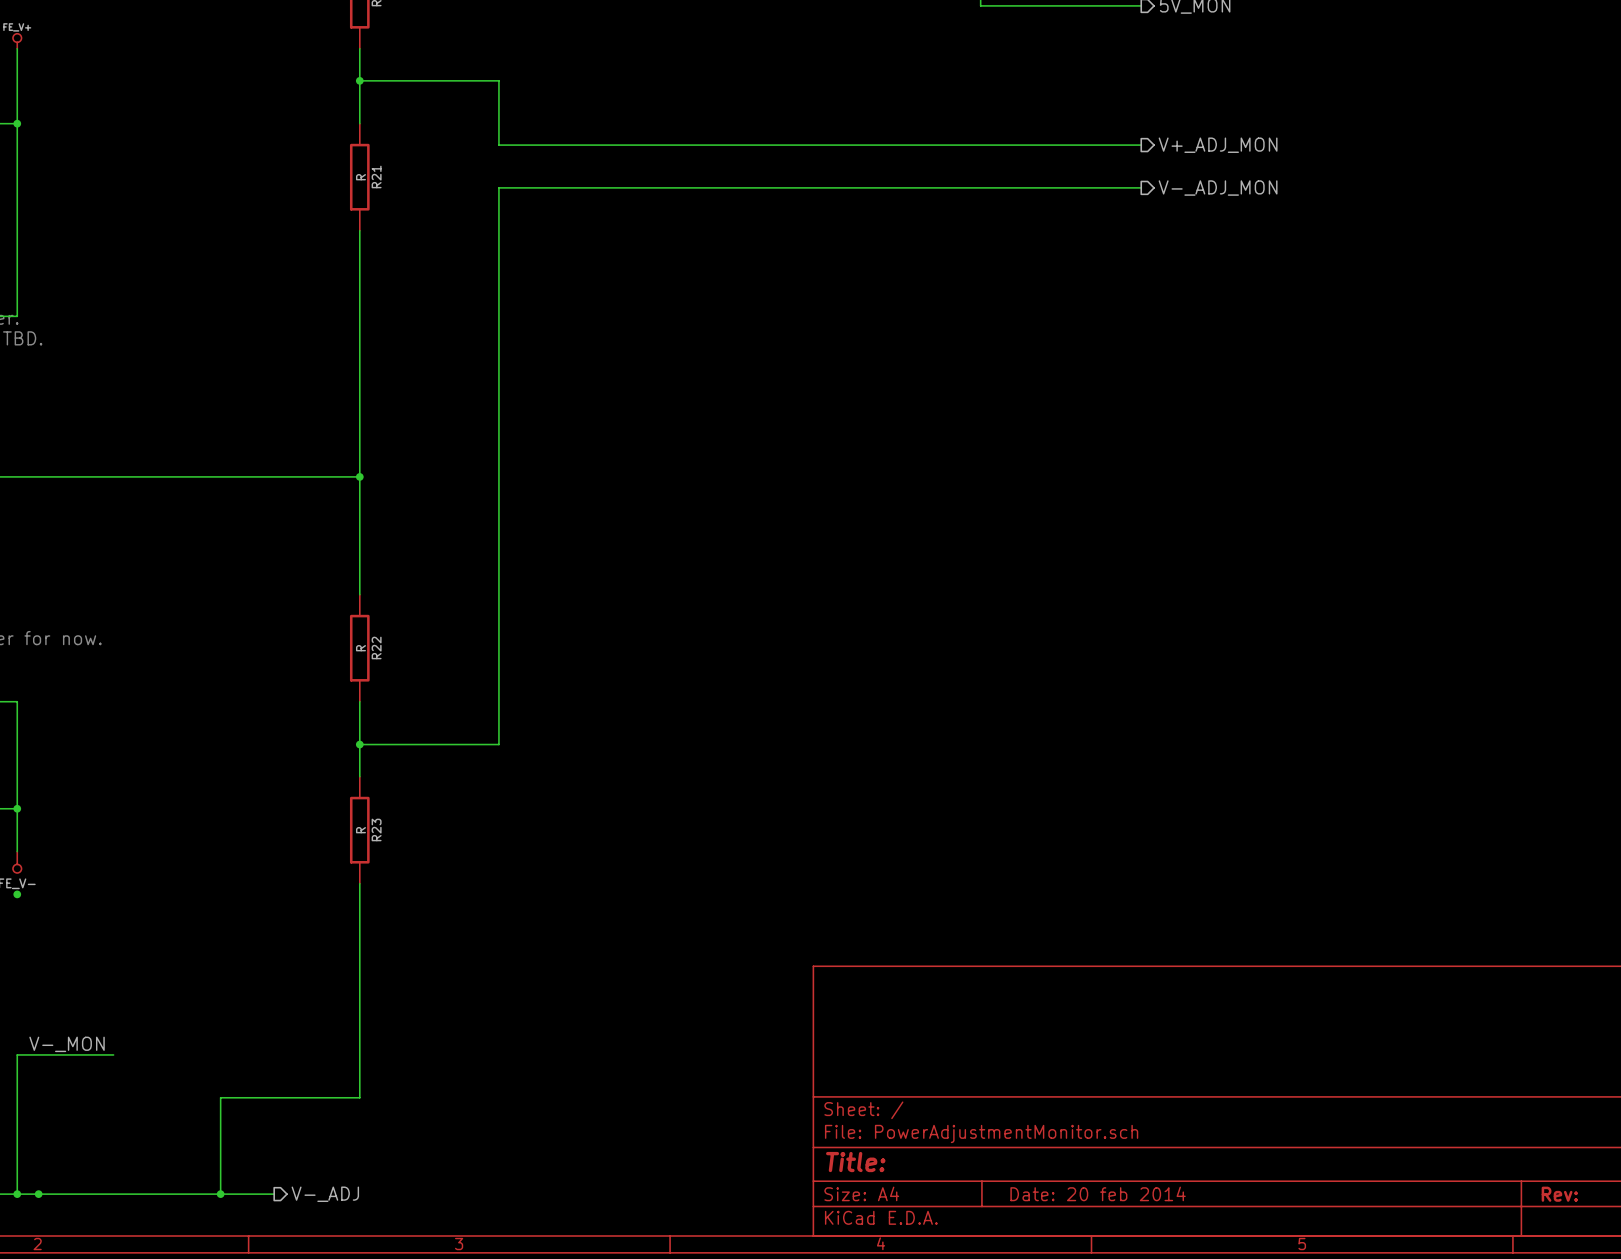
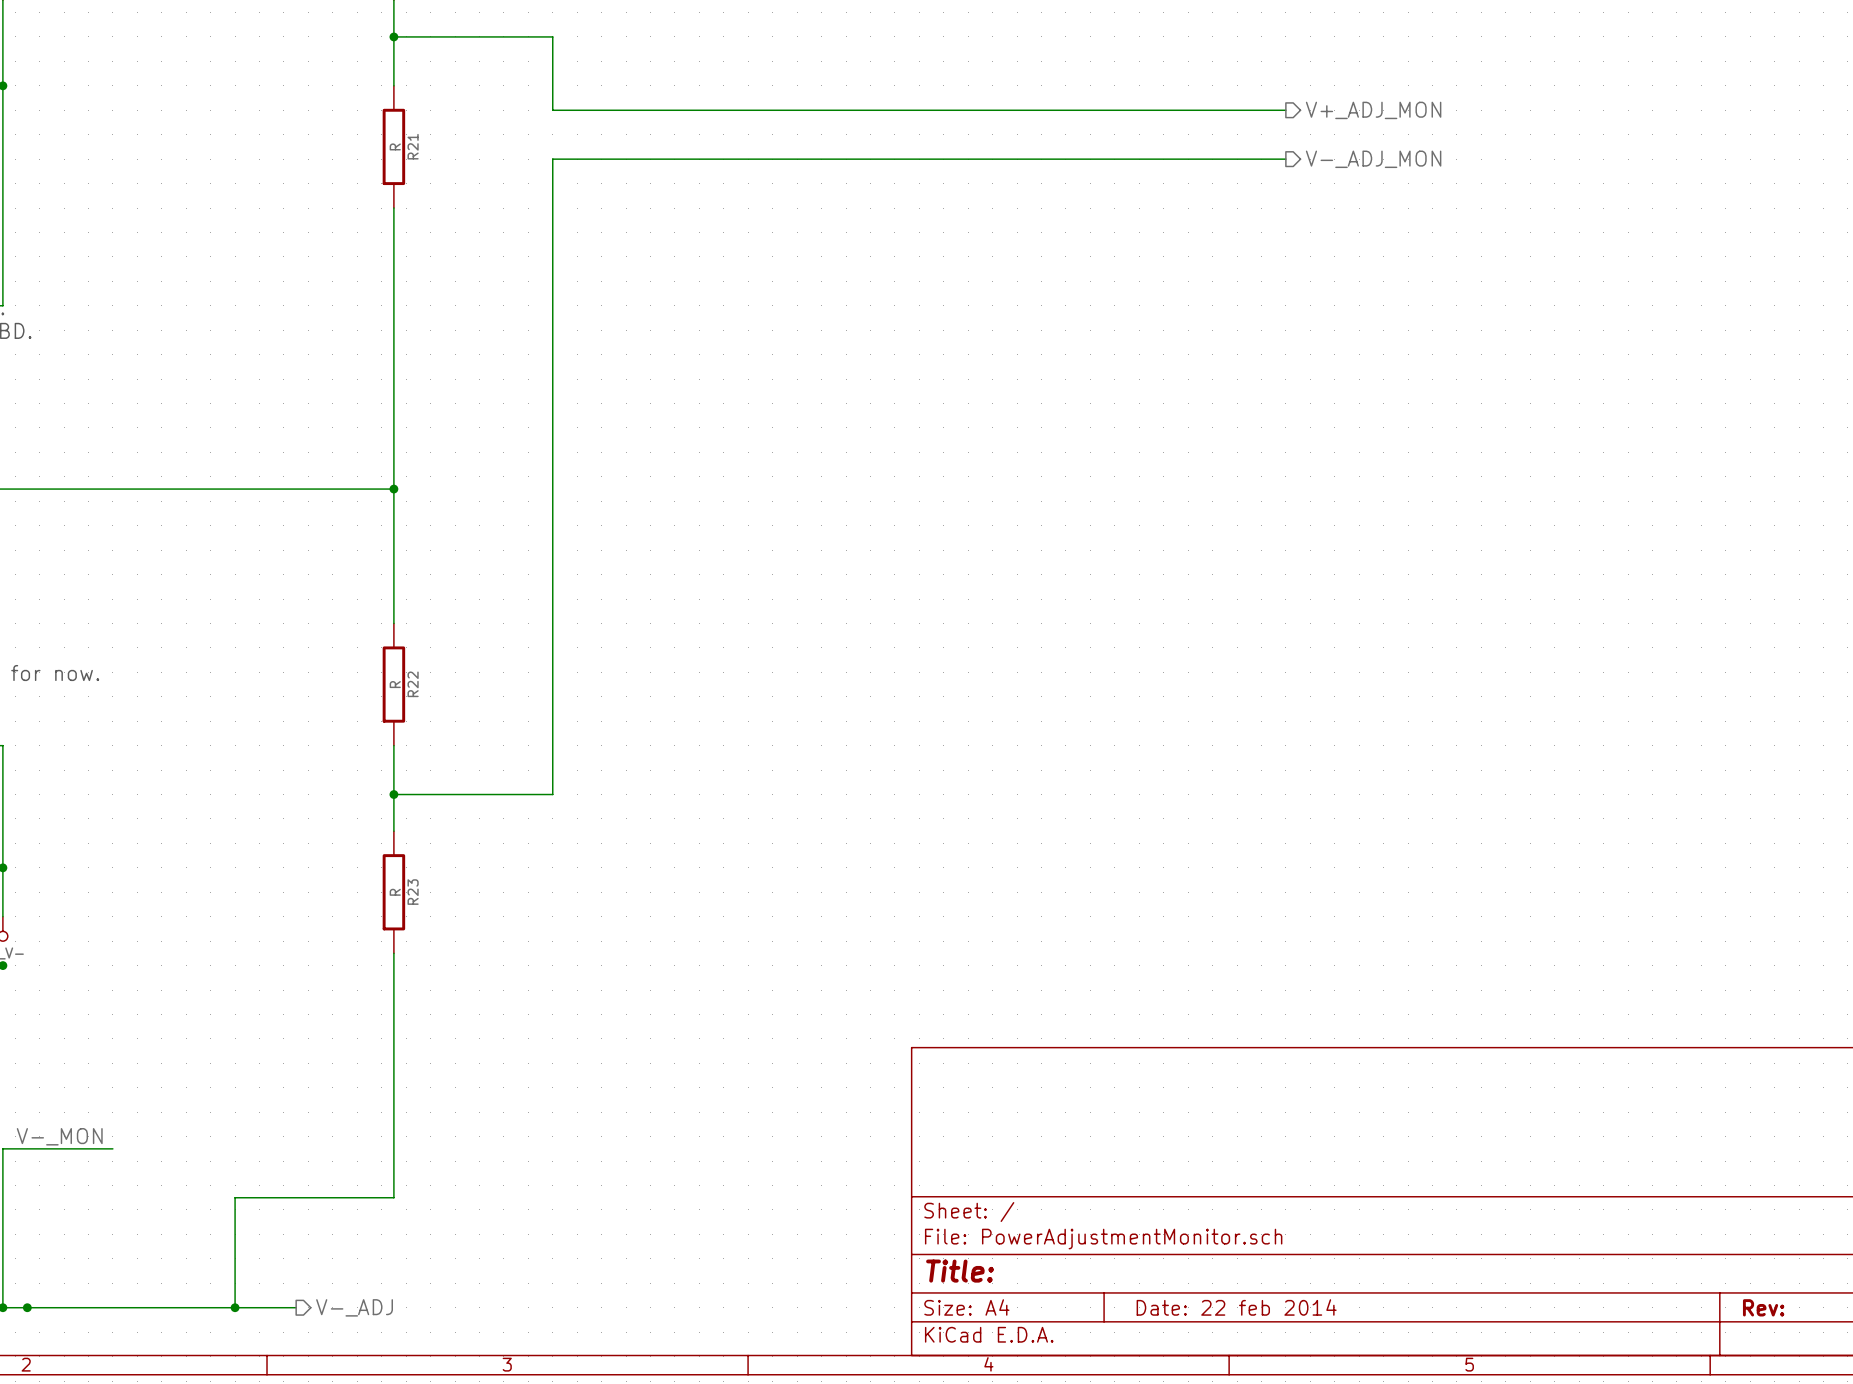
title block: Date: 20 feb 2014 (1098, 1193) -> Date: 22 feb 2014 (1236, 1307)

